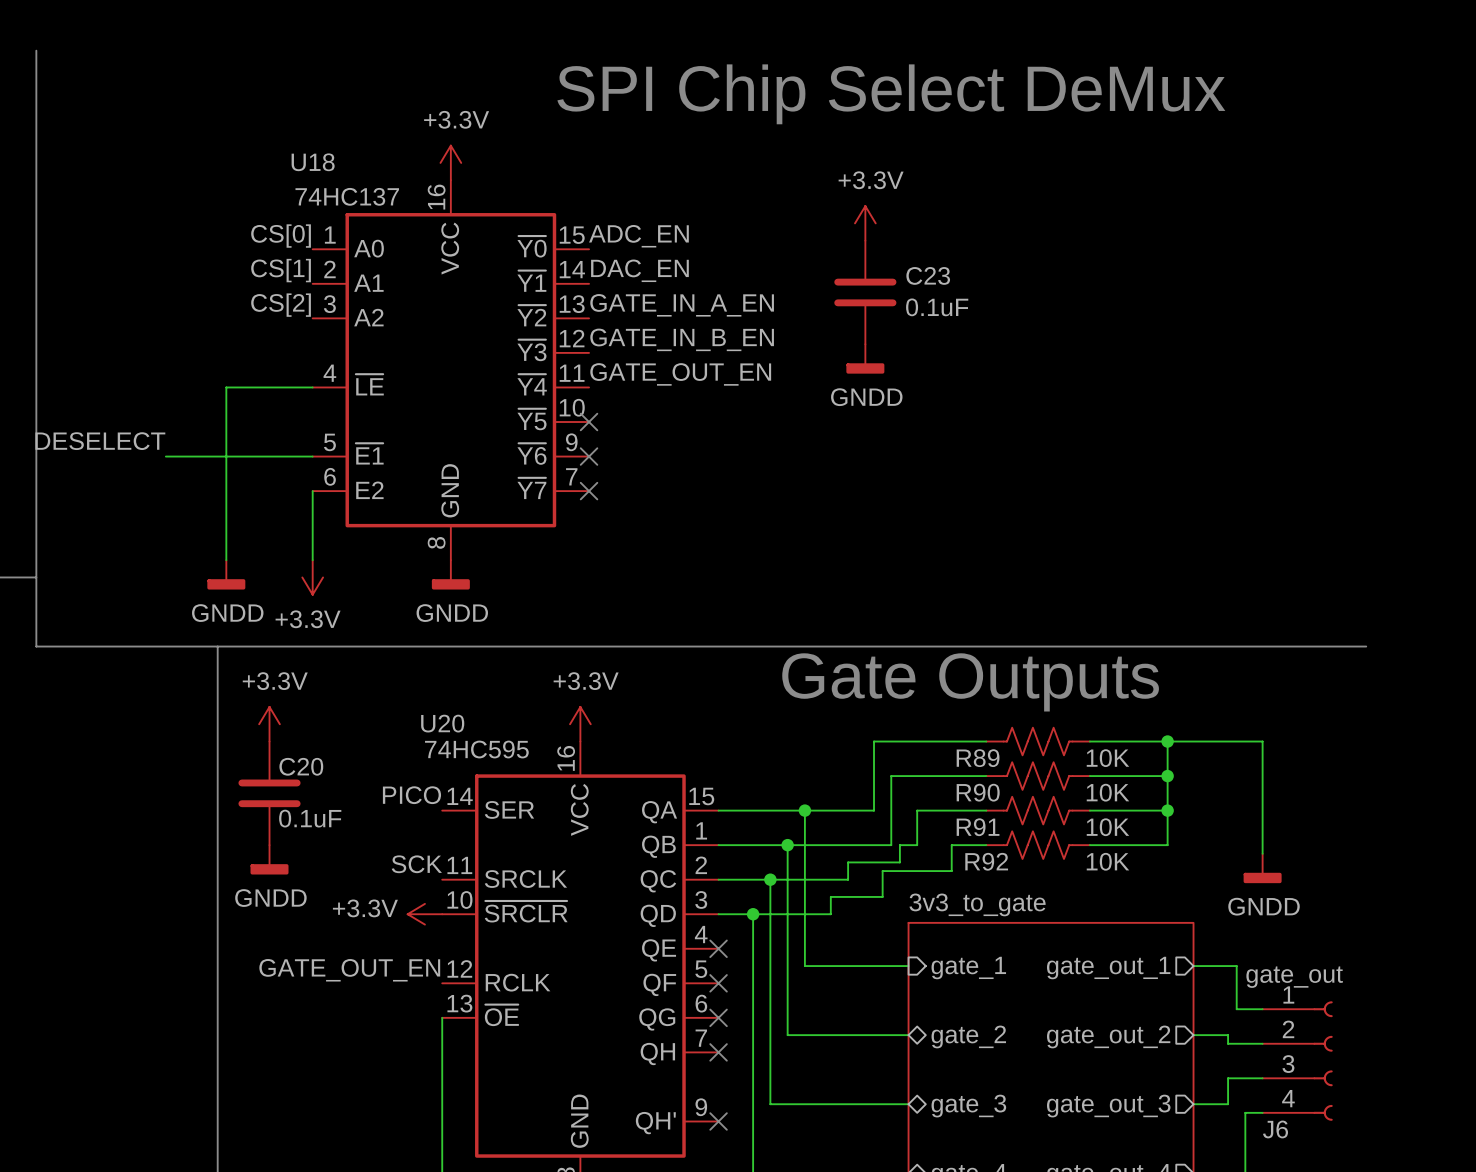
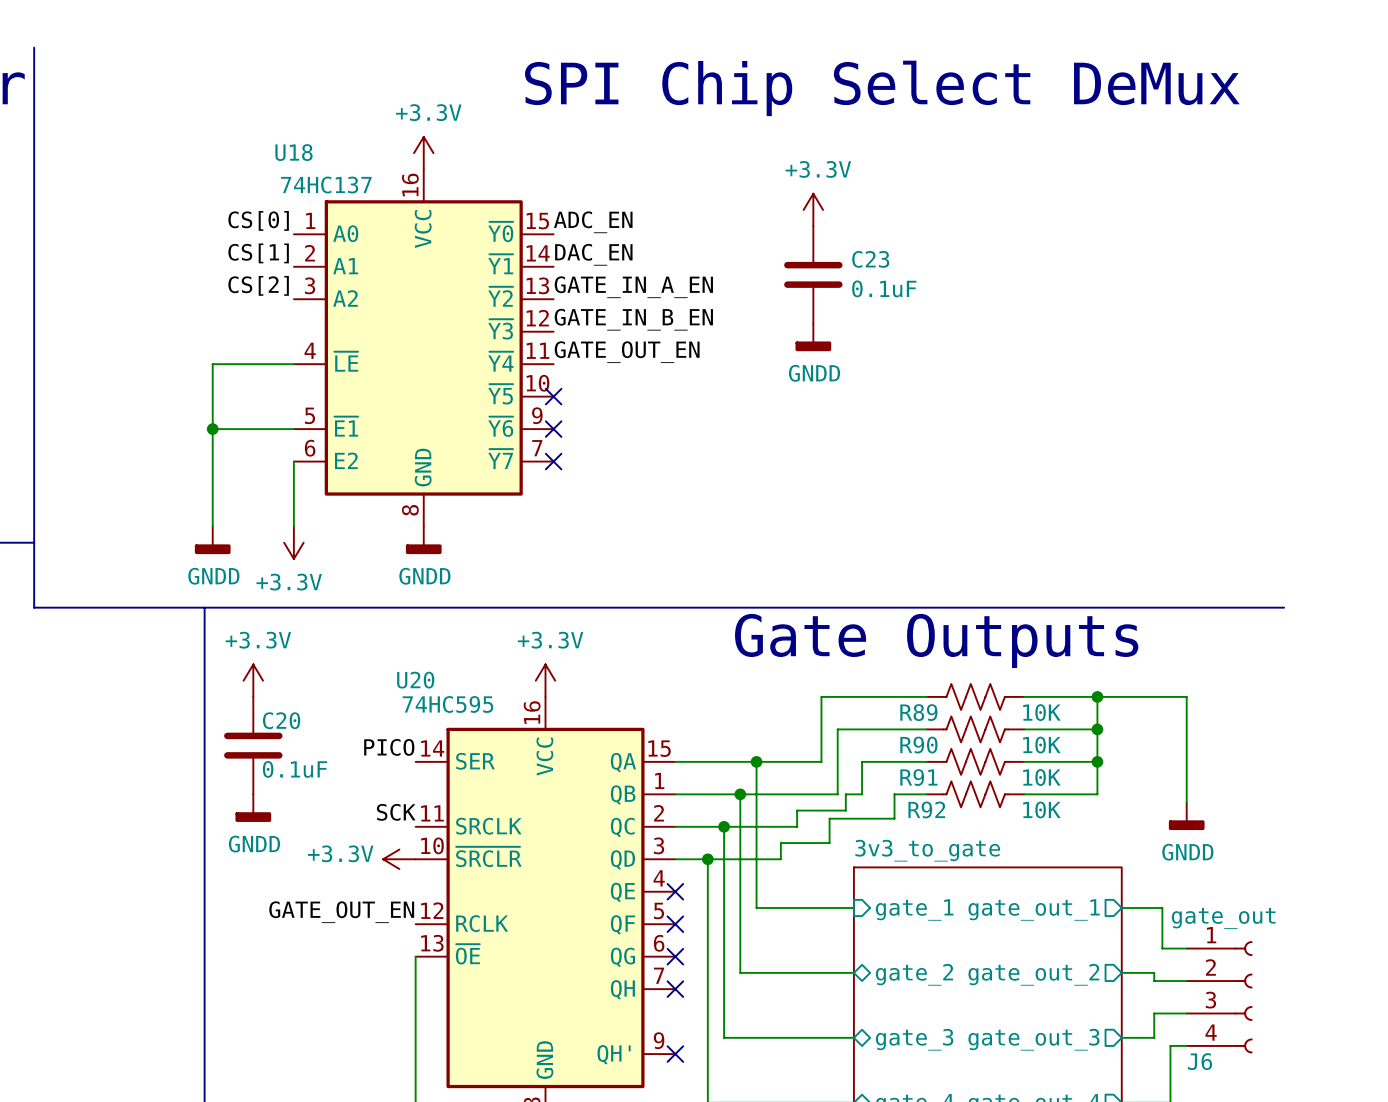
label: DESELECT (100, 441) -> none
wire: (165, 456) (226, 456) -> none
junction: none -> (212, 429)

